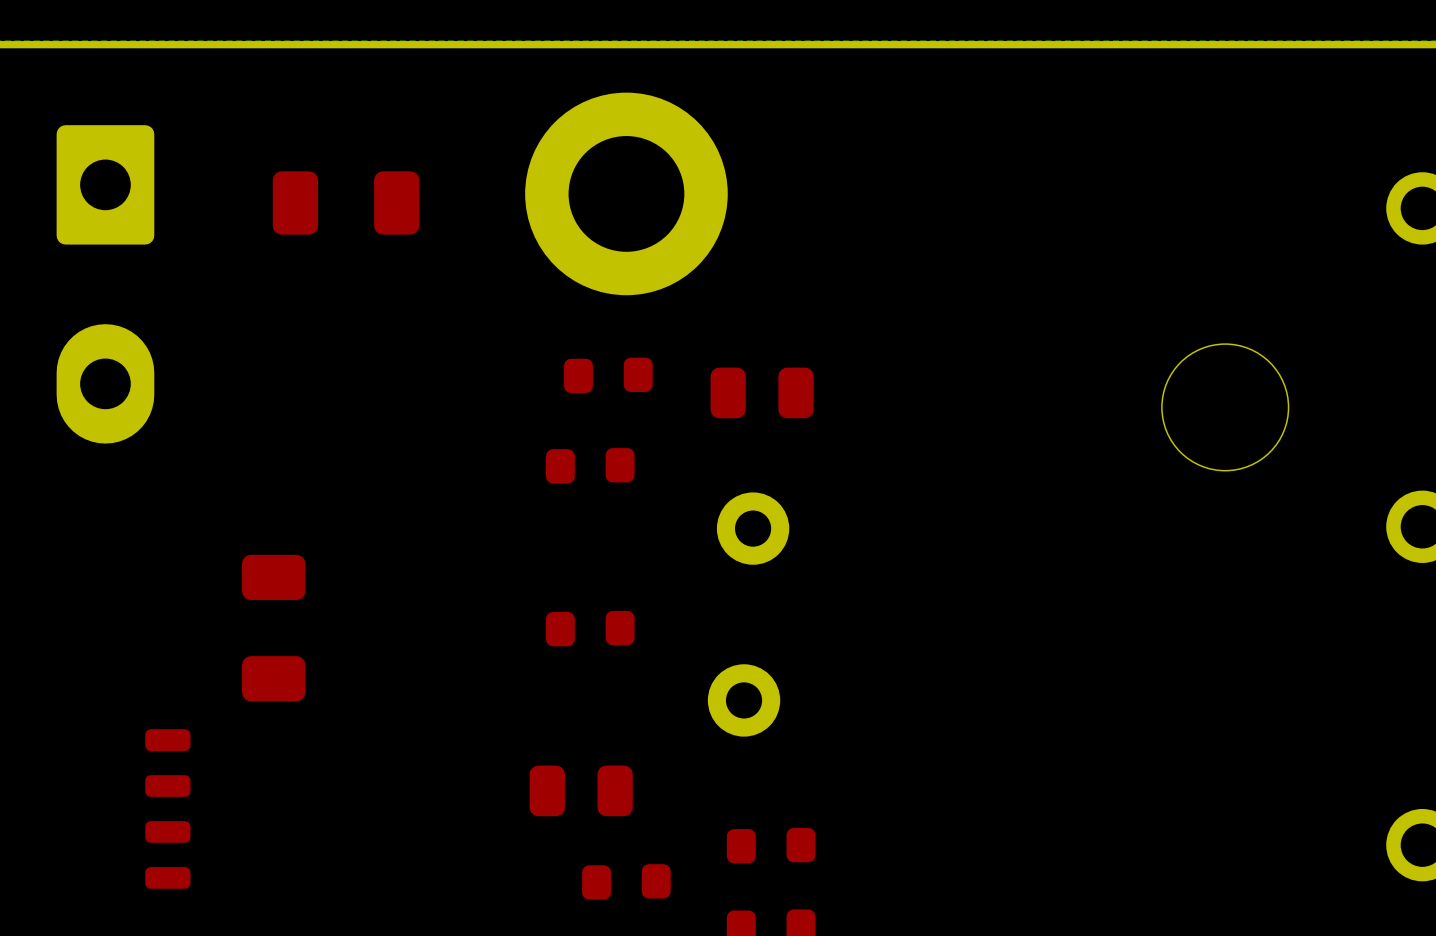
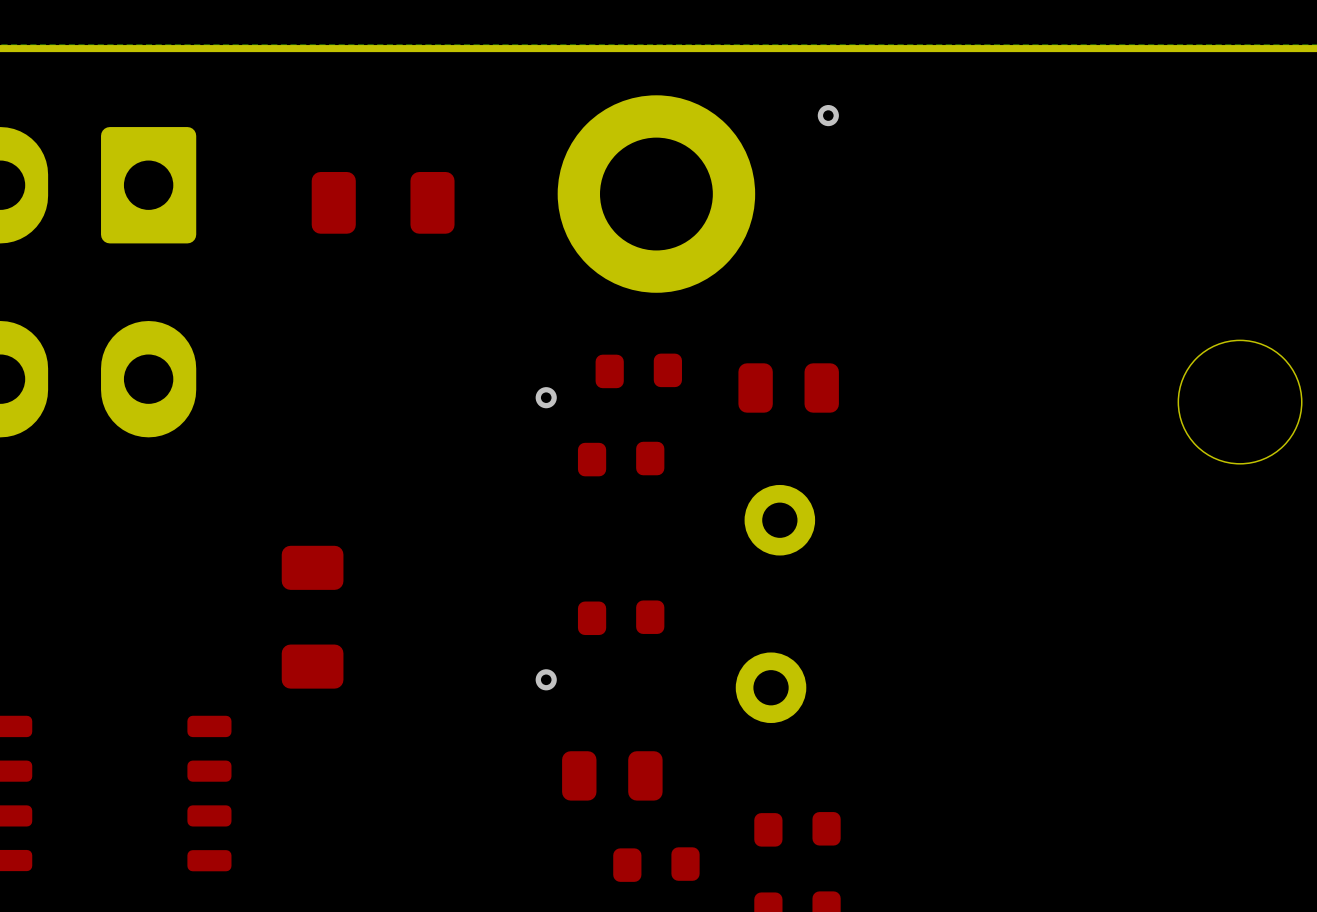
via: none -> (828, 115)
via: none -> (546, 397)
via: none -> (546, 679)

